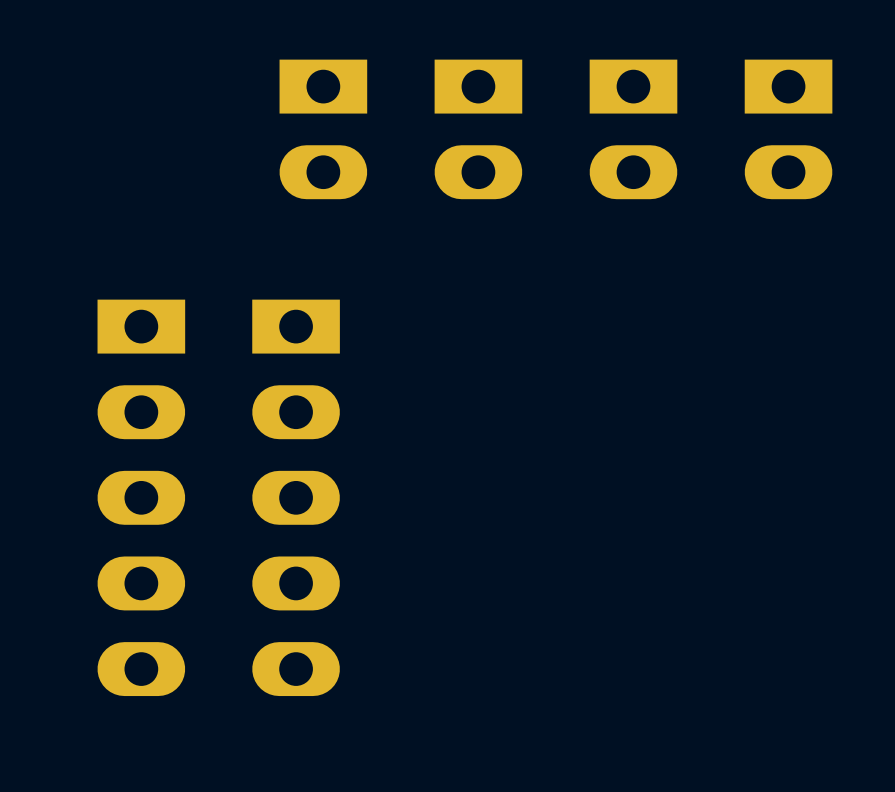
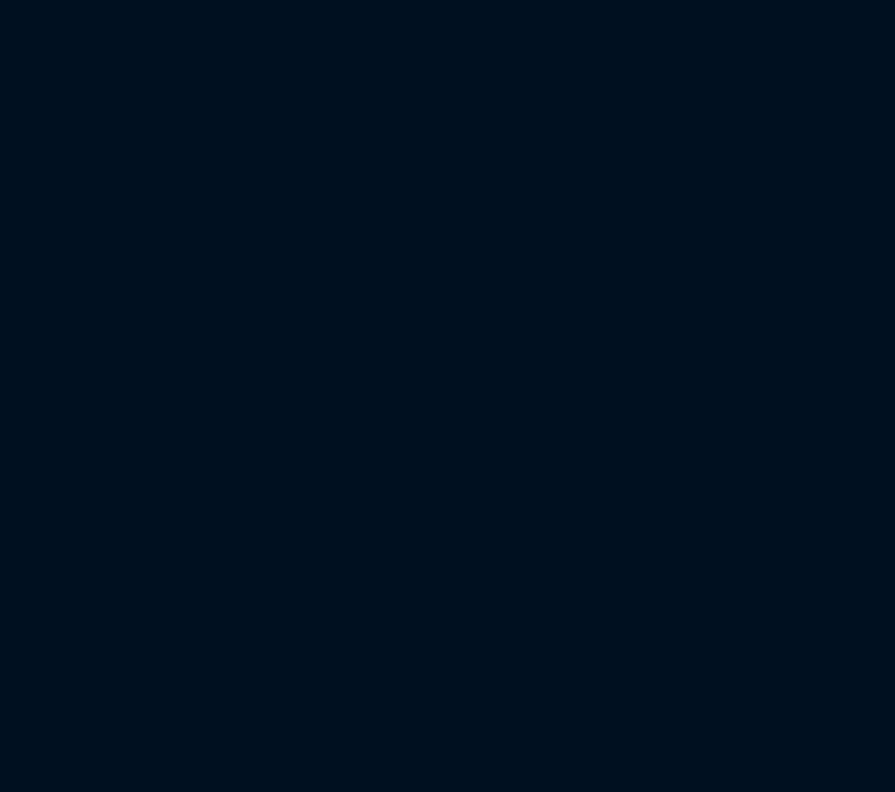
part: (323, 129) -> none
part: (478, 129) -> none
part: (633, 129) -> none
part: (788, 129) -> none
part: (141, 497) -> none
part: (296, 497) -> none

